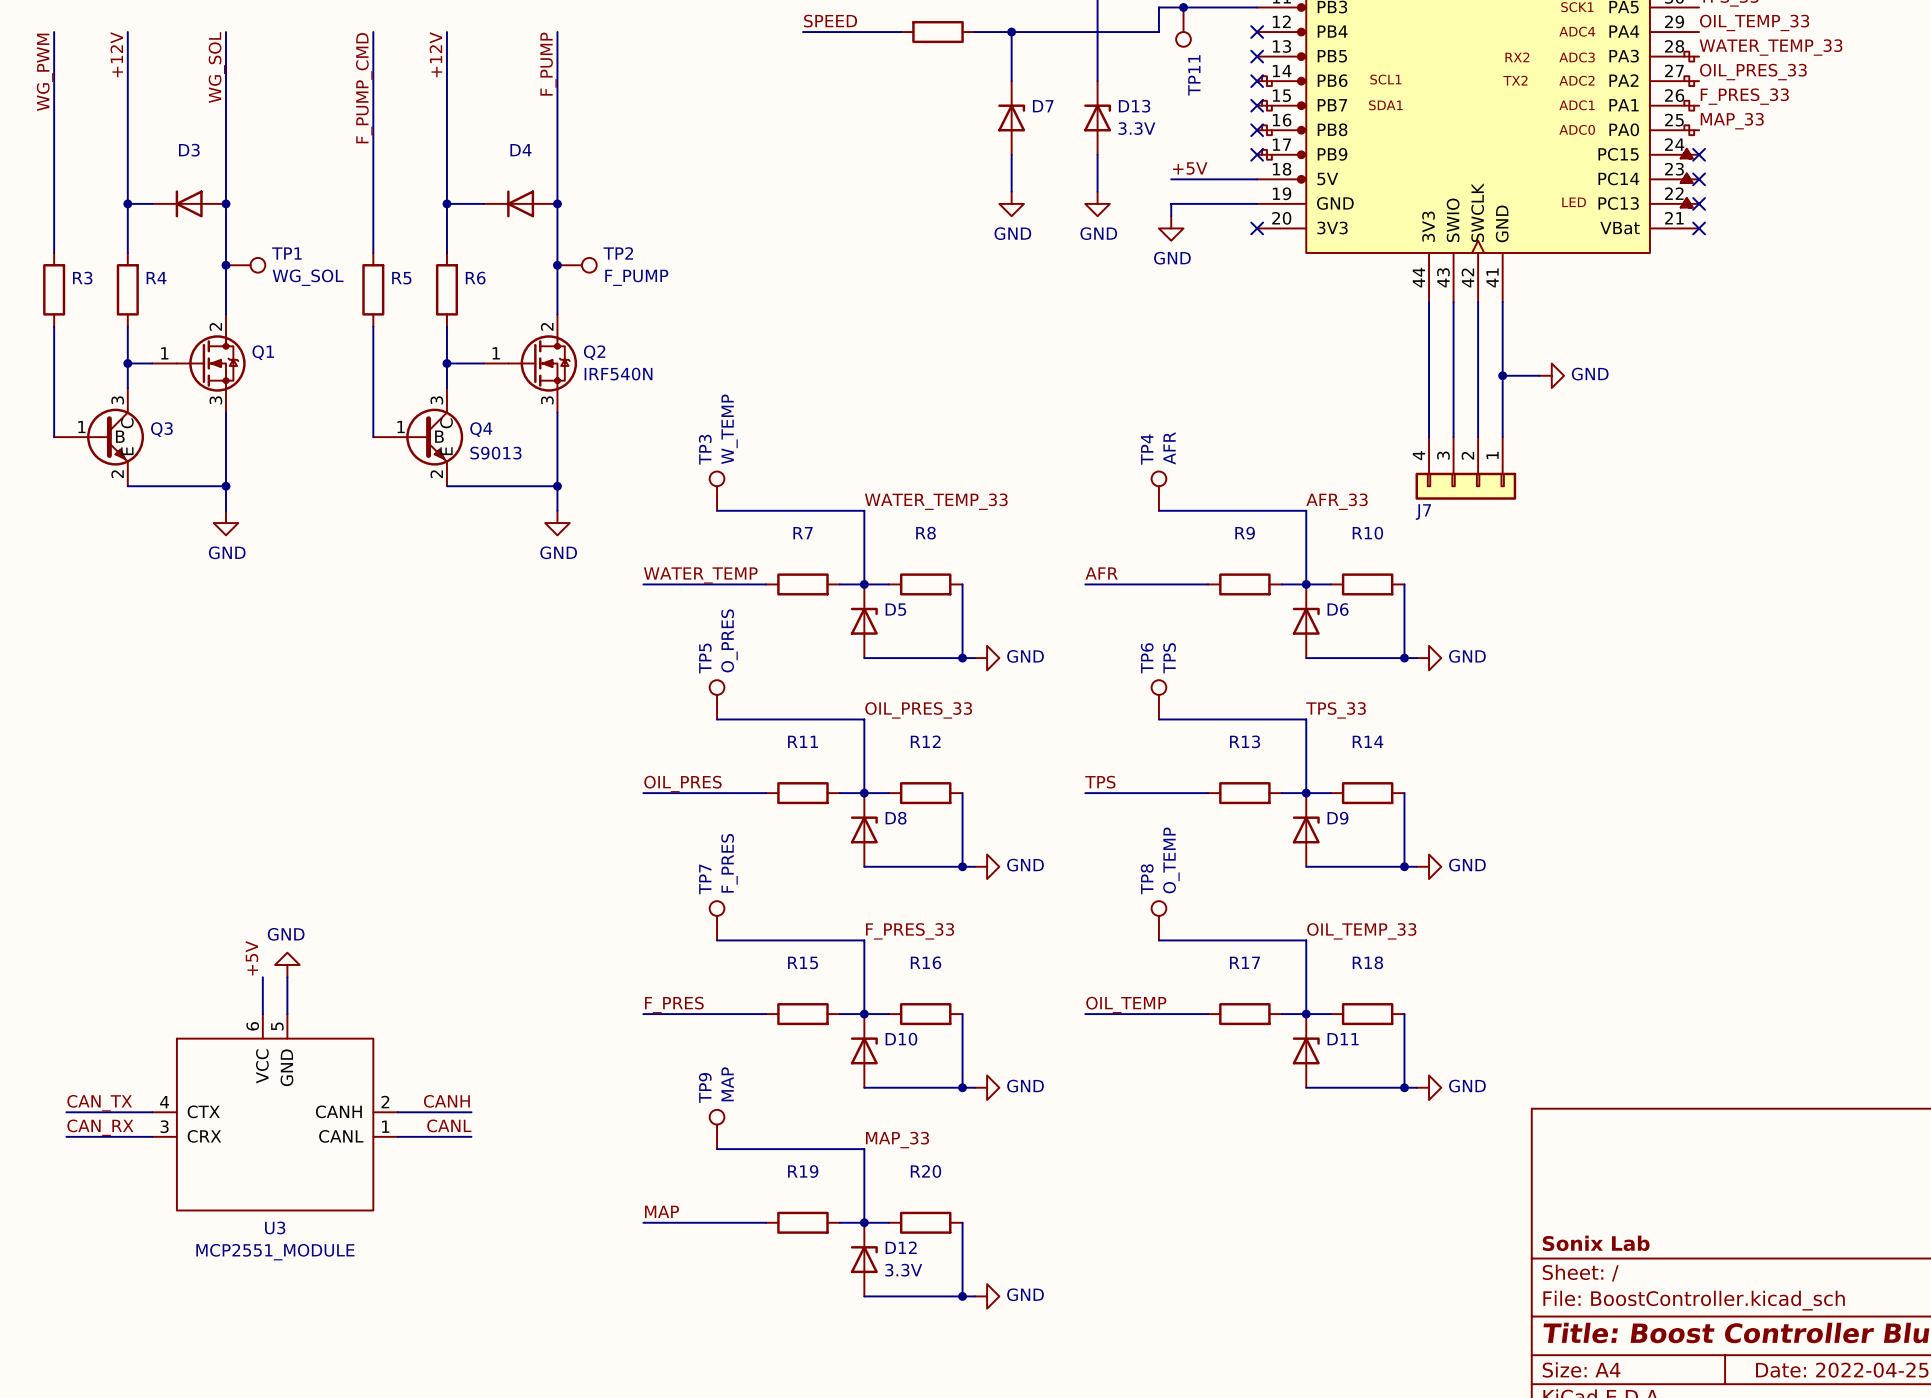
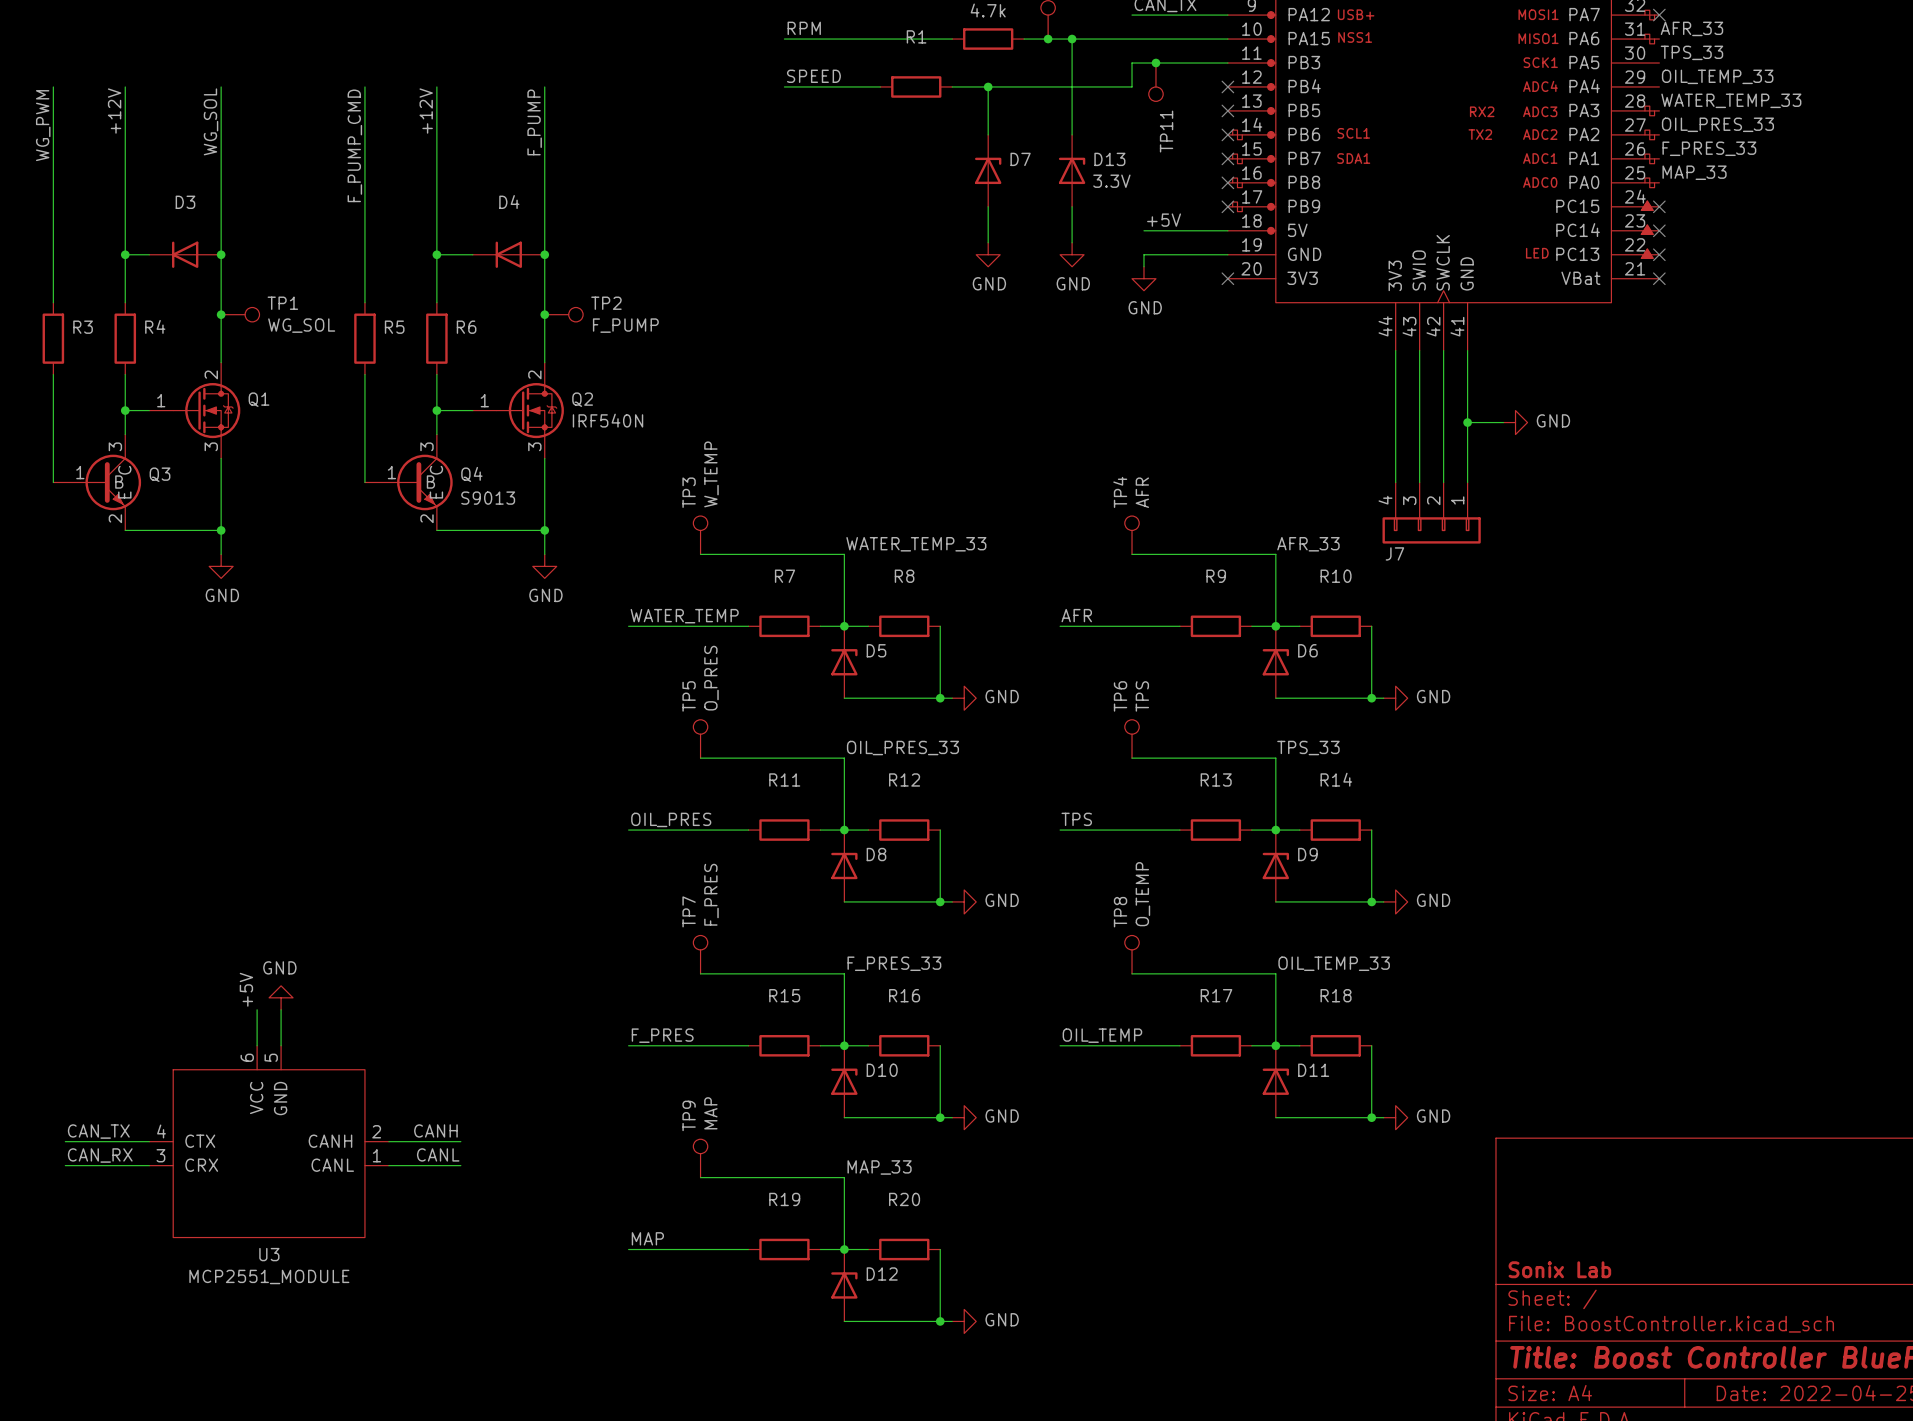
D12 value: 3.3V (903, 1270) -> none

